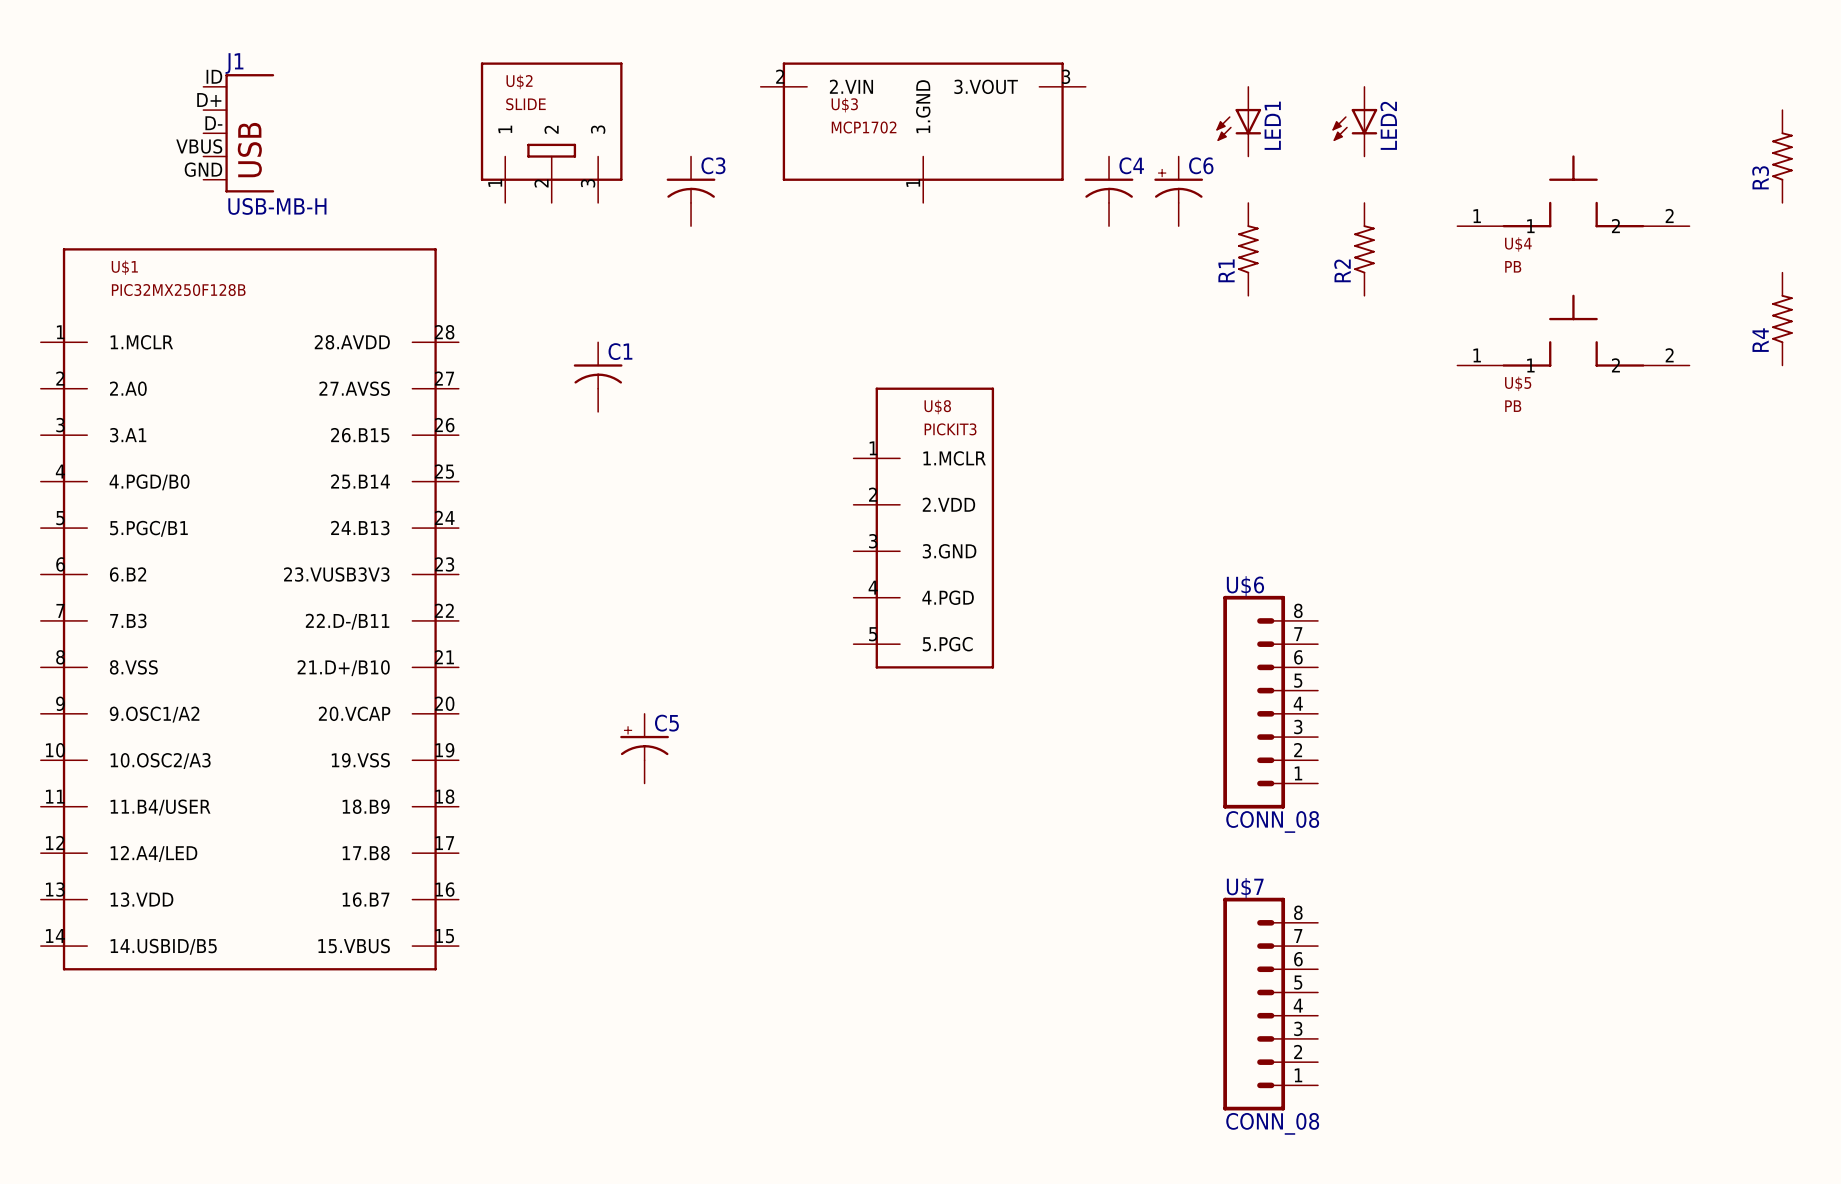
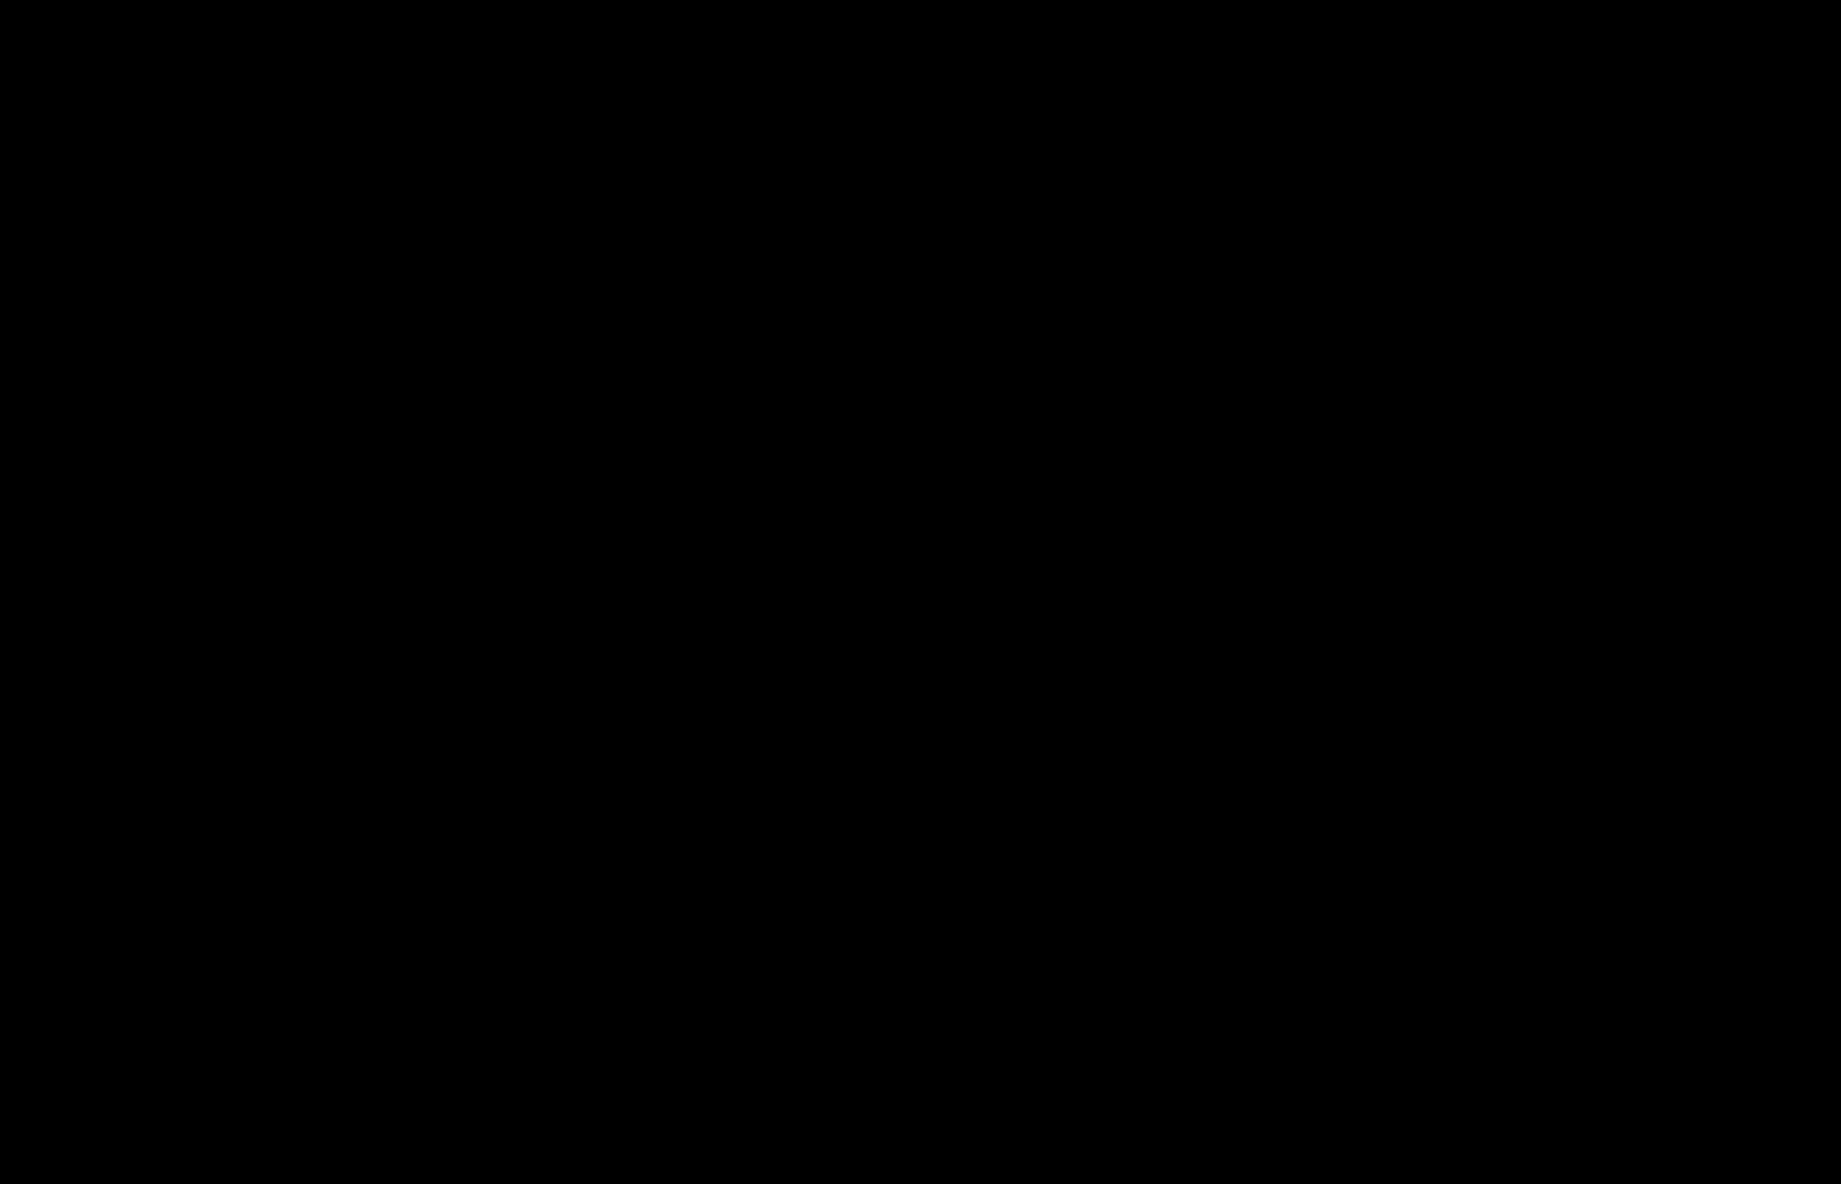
LED1: (1238, 121) -> none
LED2: (1354, 121) -> none
U$2: SLIDE (551, 132) -> none
U$3: MCP1702 (923, 132) -> none
J1: USB-MB-H (238, 133) -> none
R3: (1782, 156) -> none
C3: (691, 191) -> none
C4: (1109, 191) -> none
C6: (1178, 191) -> none
U$4: PB (1573, 191) -> none
R1: (1248, 249) -> none
R2: (1364, 249) -> none
R4: (1782, 319) -> none
U$5: PB (1573, 330) -> none
C1: (598, 377) -> none
U$8: PICKIT3 (923, 528) -> none
U$1: PIC32MX250F128B (249, 609) -> none
U$6: CONN_08 (1270, 702) -> none
C5: (644, 748) -> none
U$7: CONN_08 (1270, 1004) -> none

